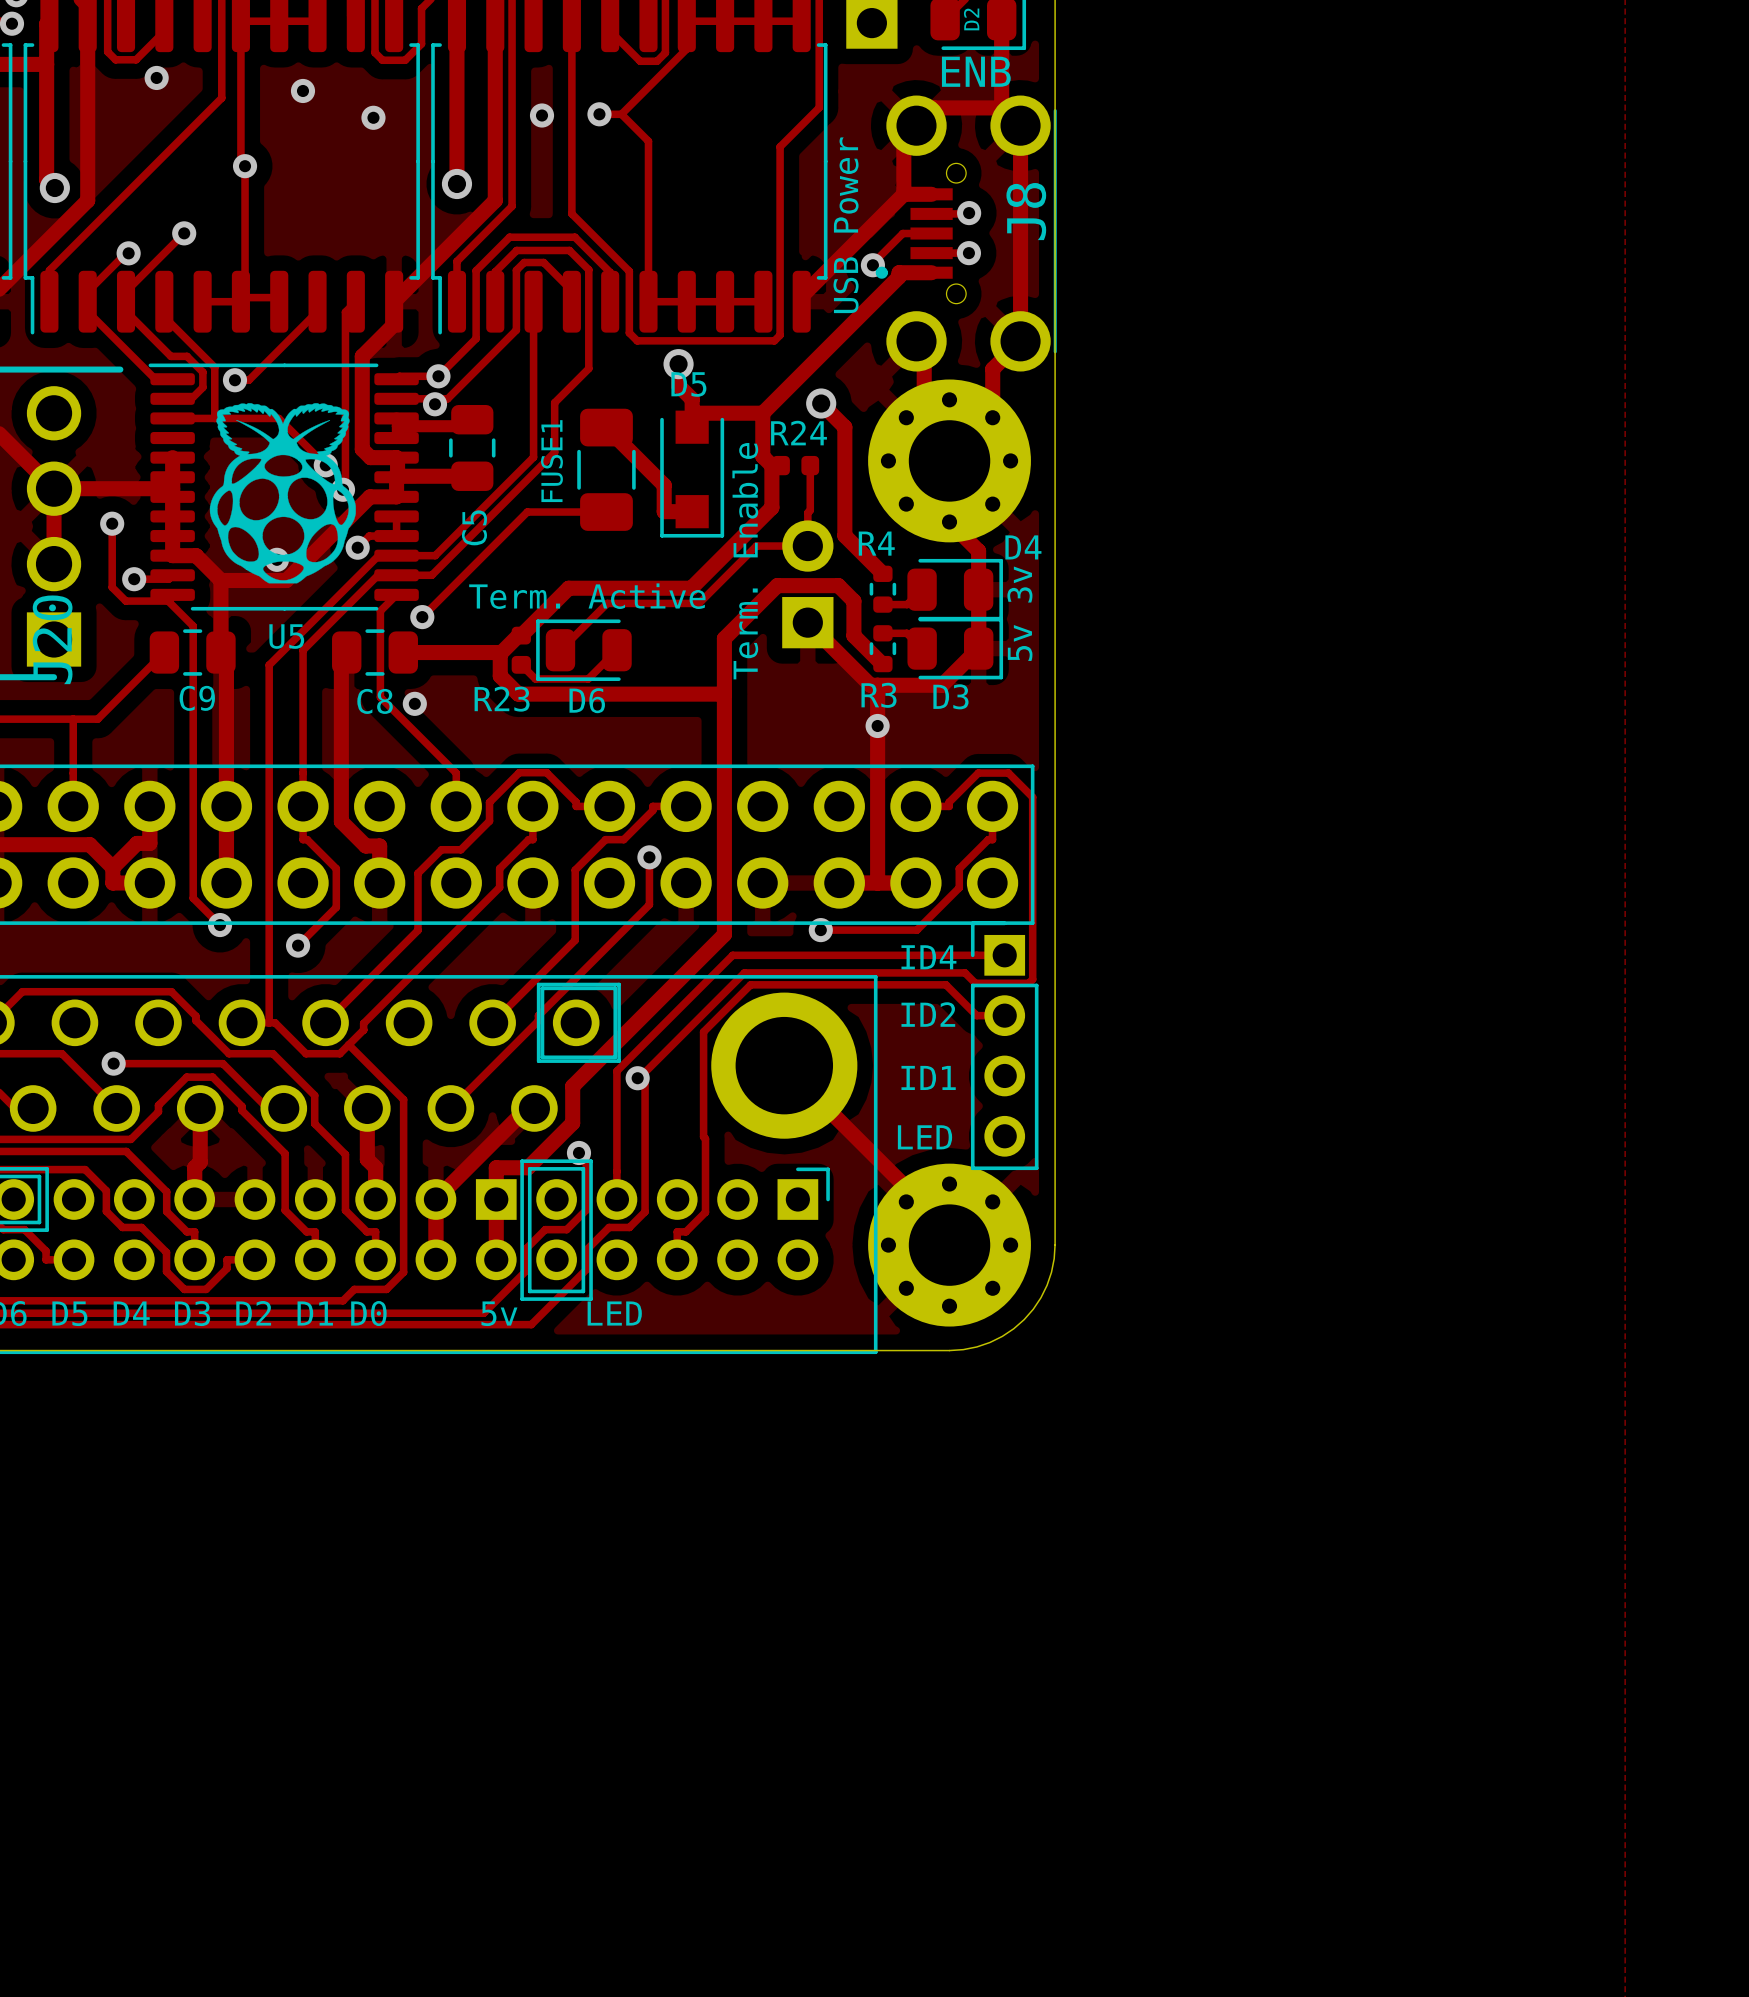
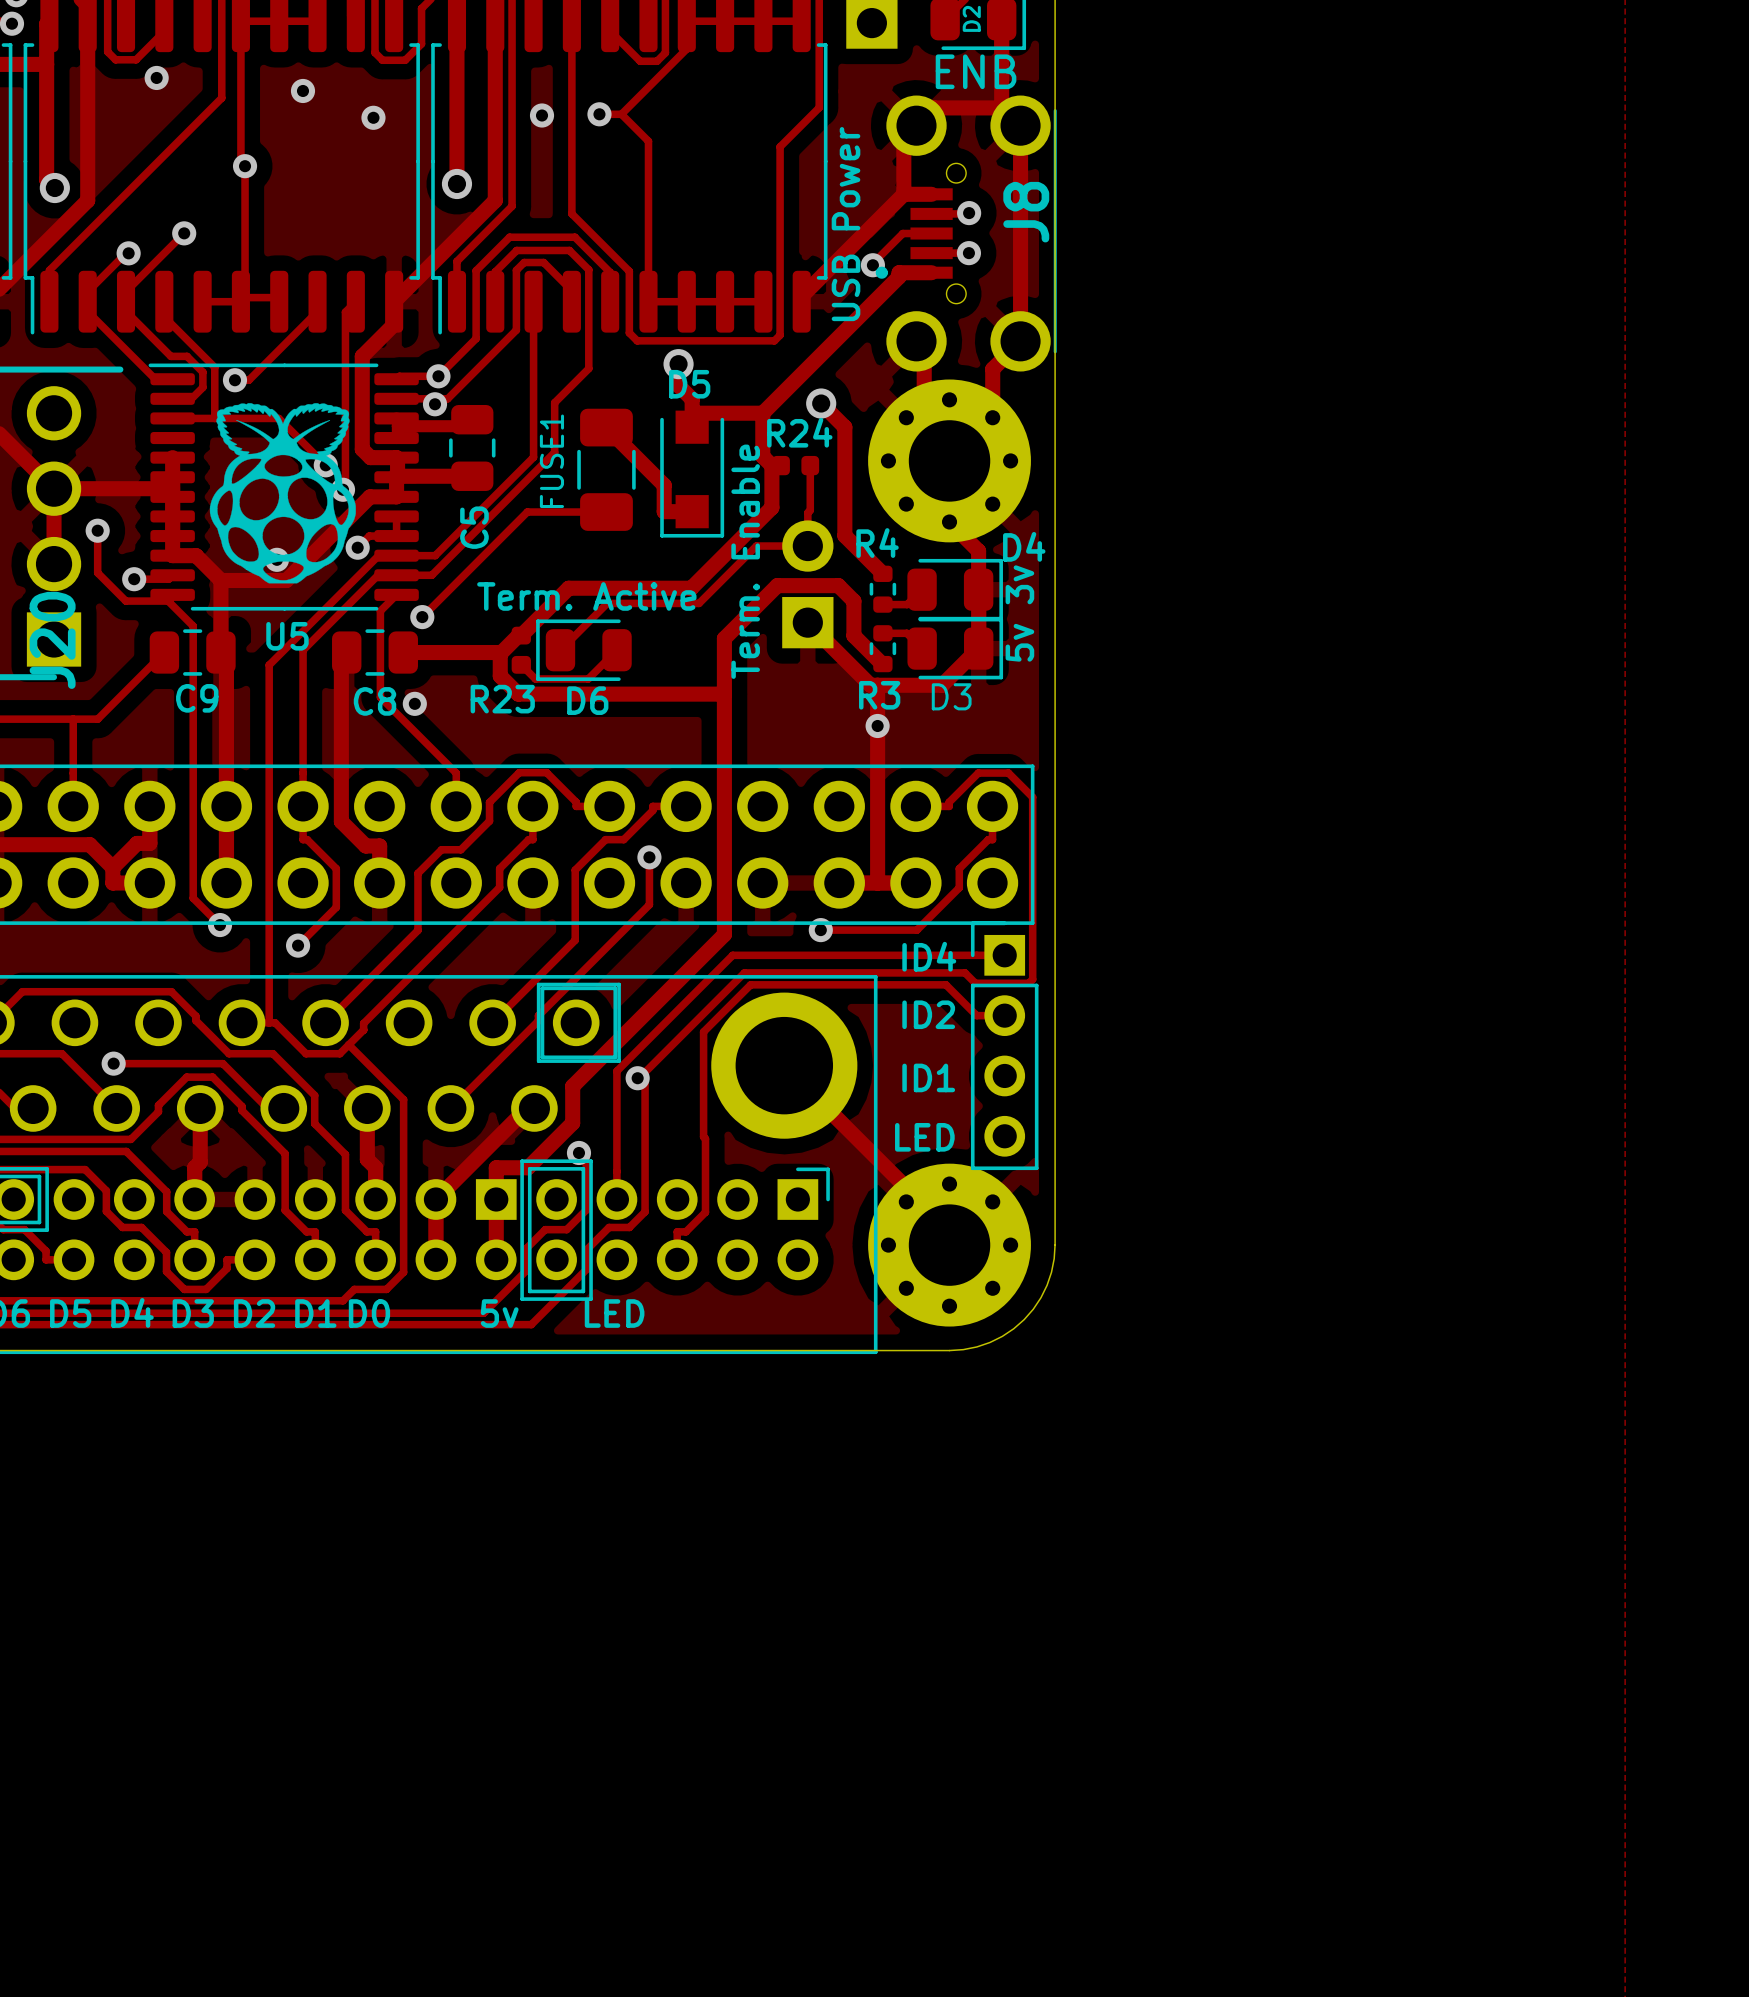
track: (112, 523) (112, 587) -> (97, 530) (97, 572) (112, 587)
via position: (112, 523) -> (97, 530)

